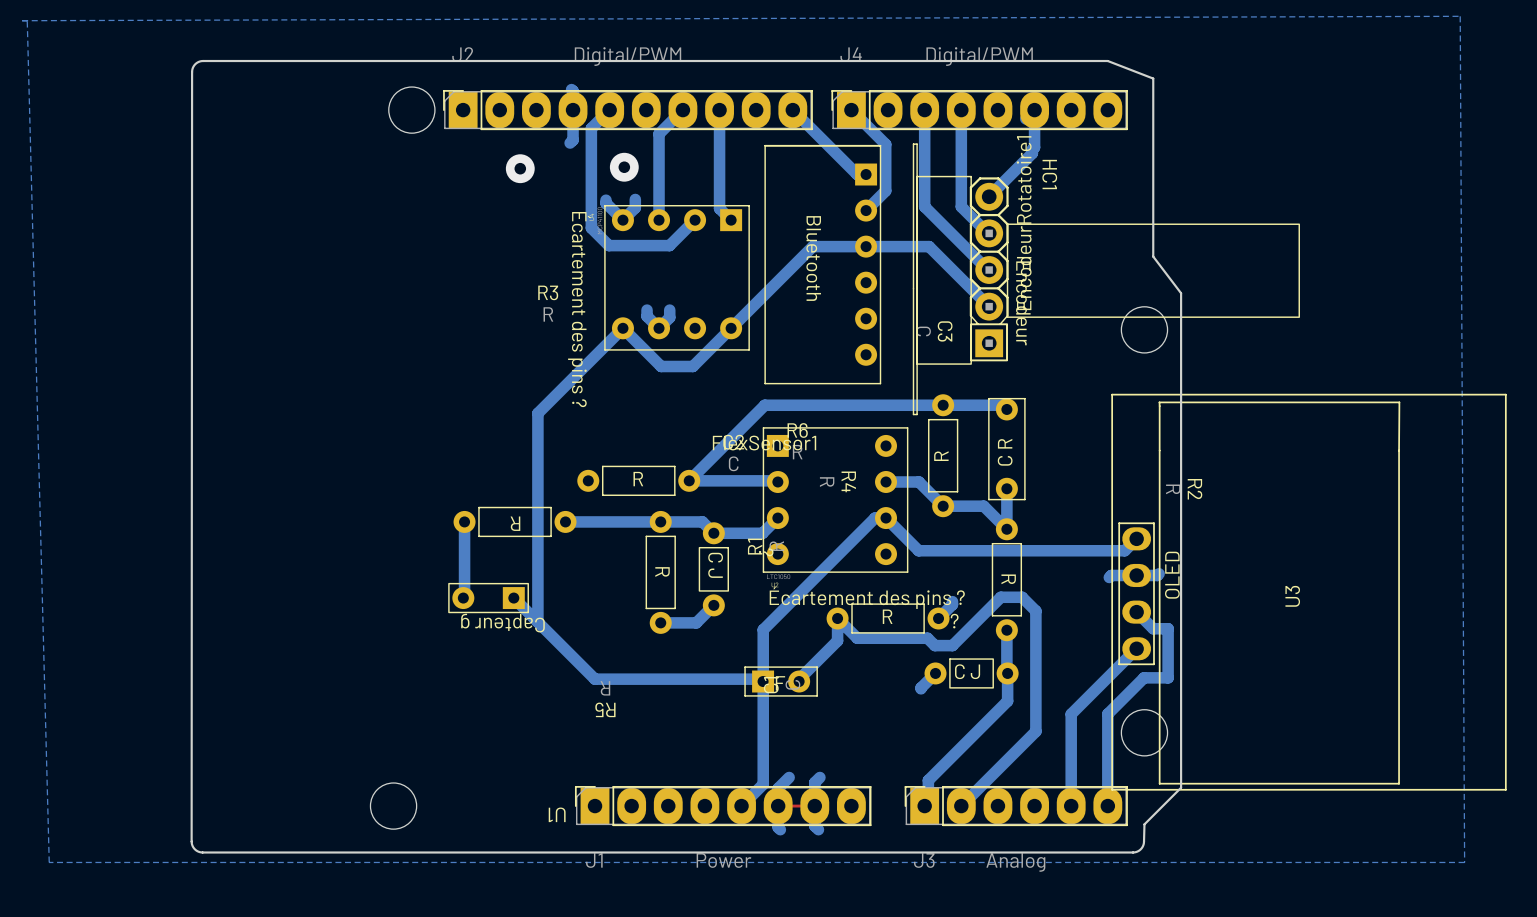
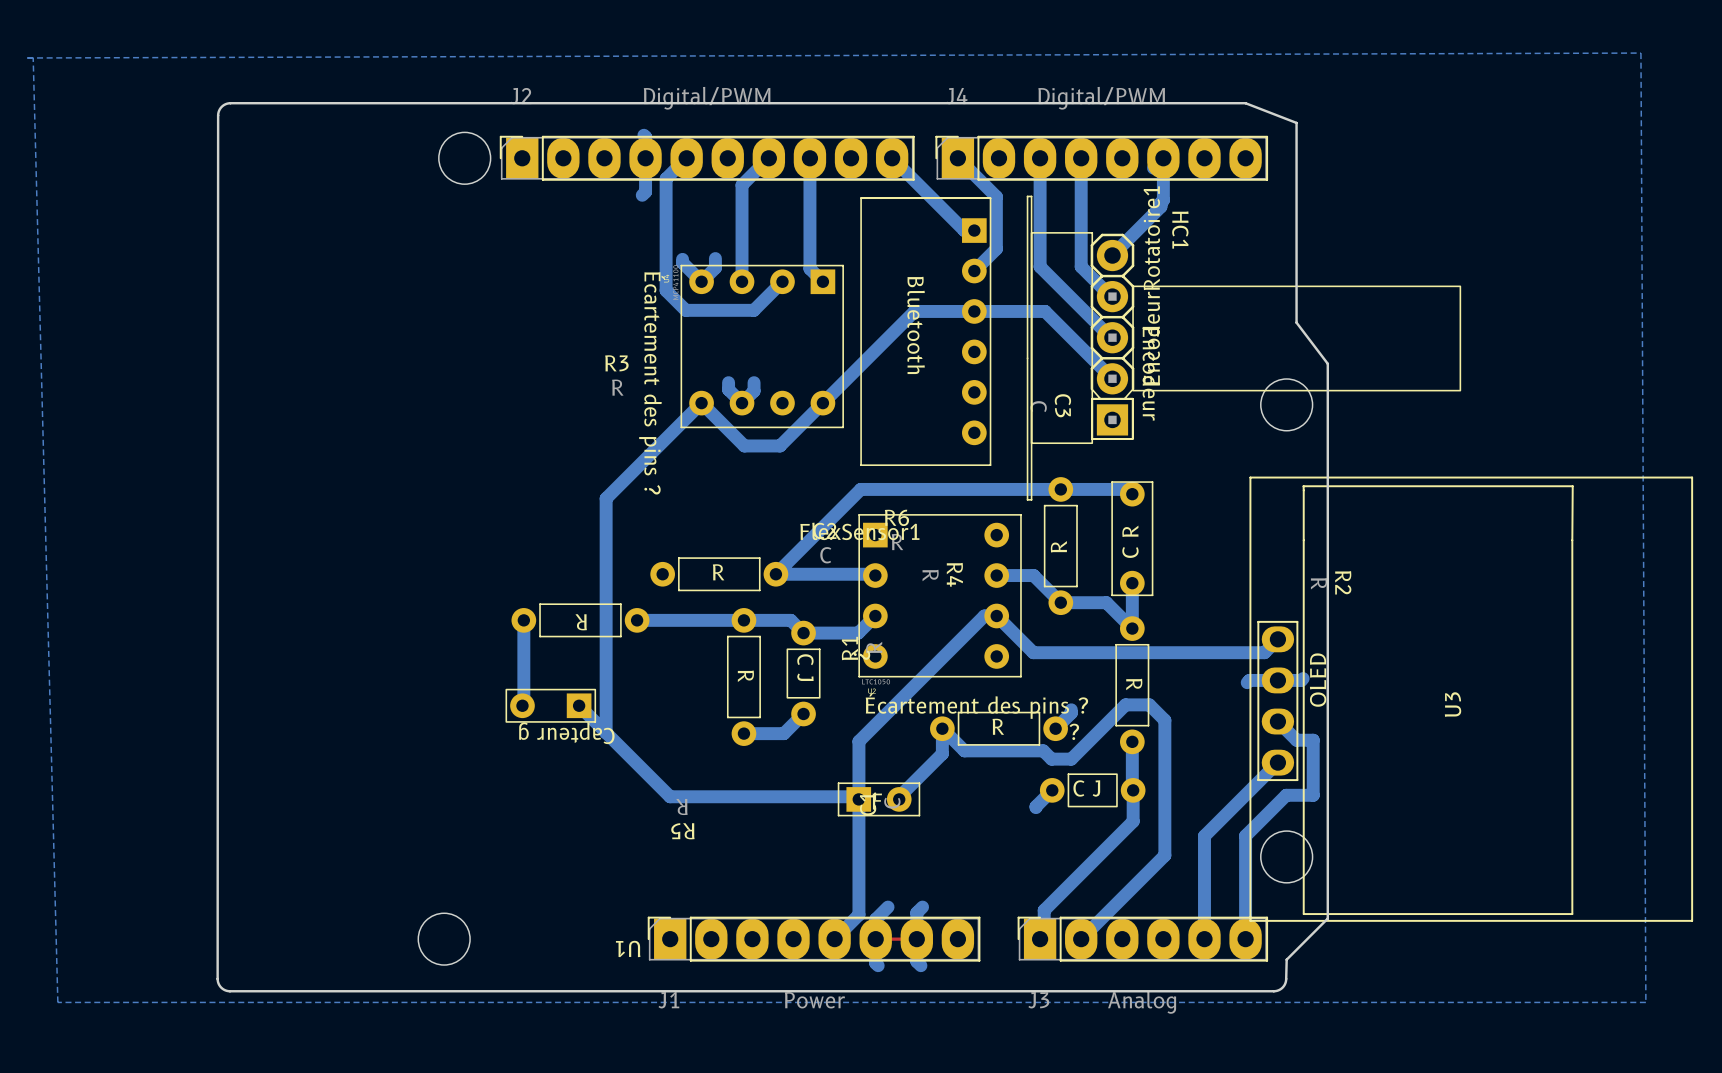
via: (624, 167) -> none
via: (520, 168) -> none

